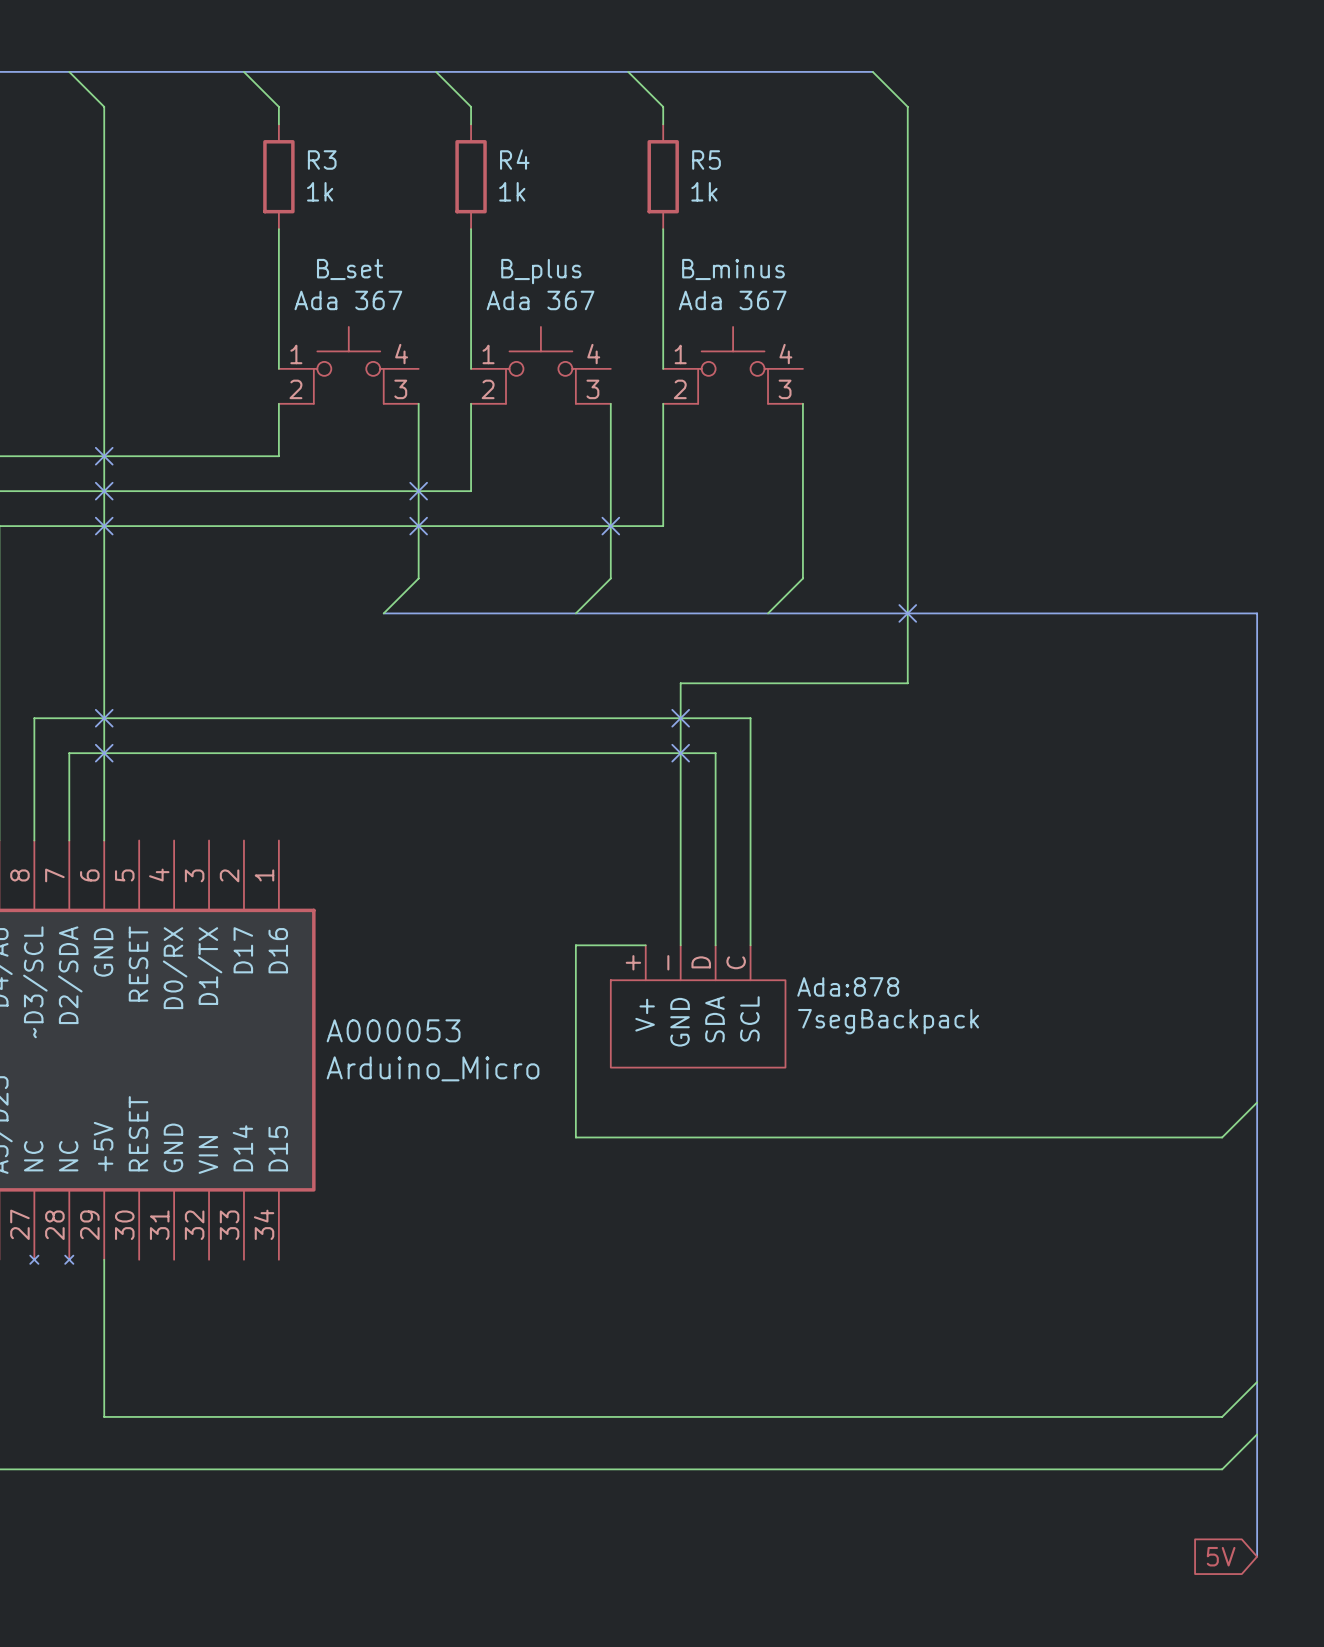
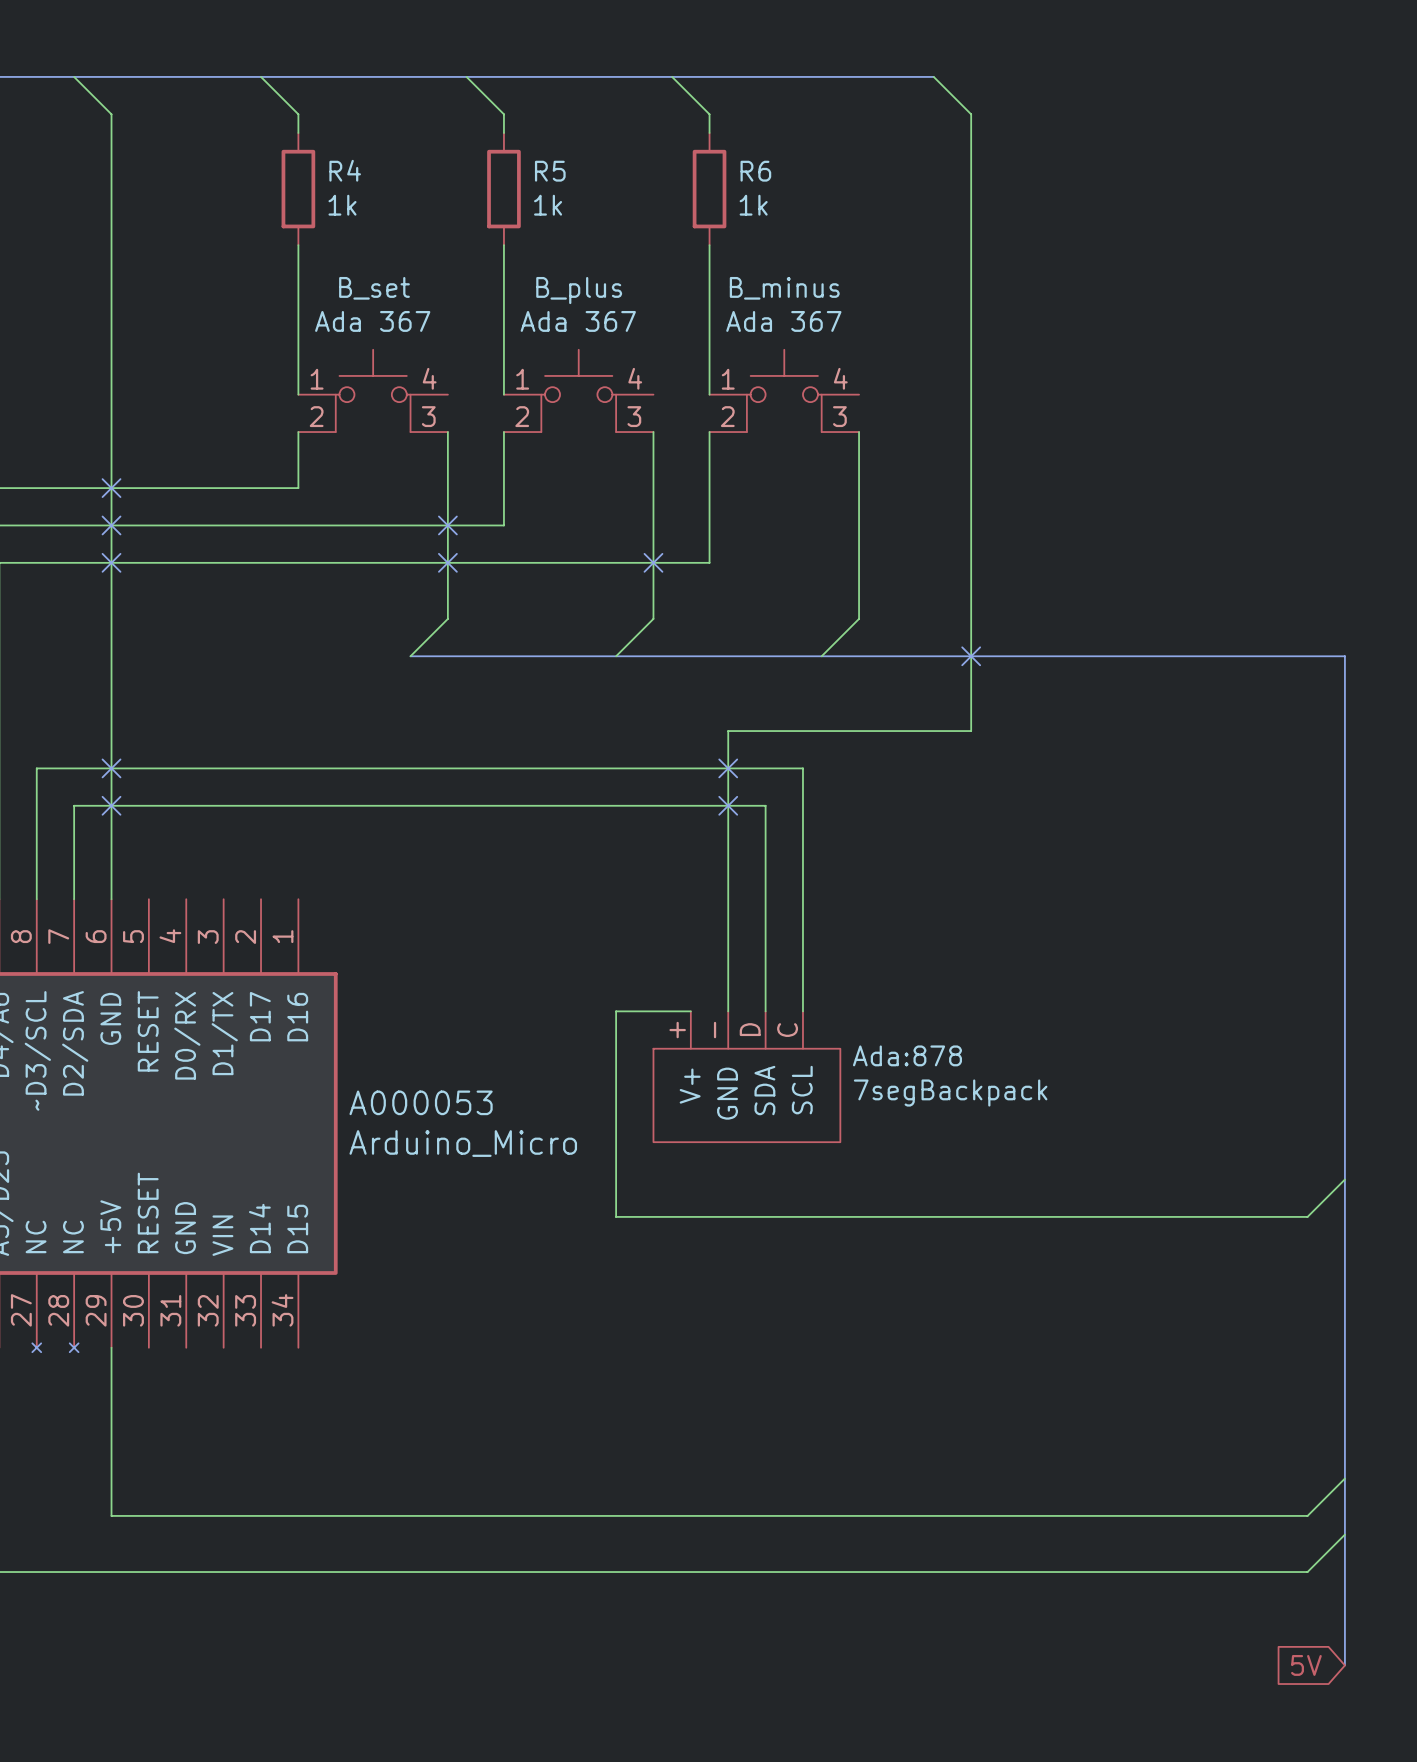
R4 name: R4 (514, 159) -> R5 (550, 171)
R3 name: R3 (322, 160) -> R4 (345, 170)
R5 name: R5 (706, 160) -> R6 (755, 171)

